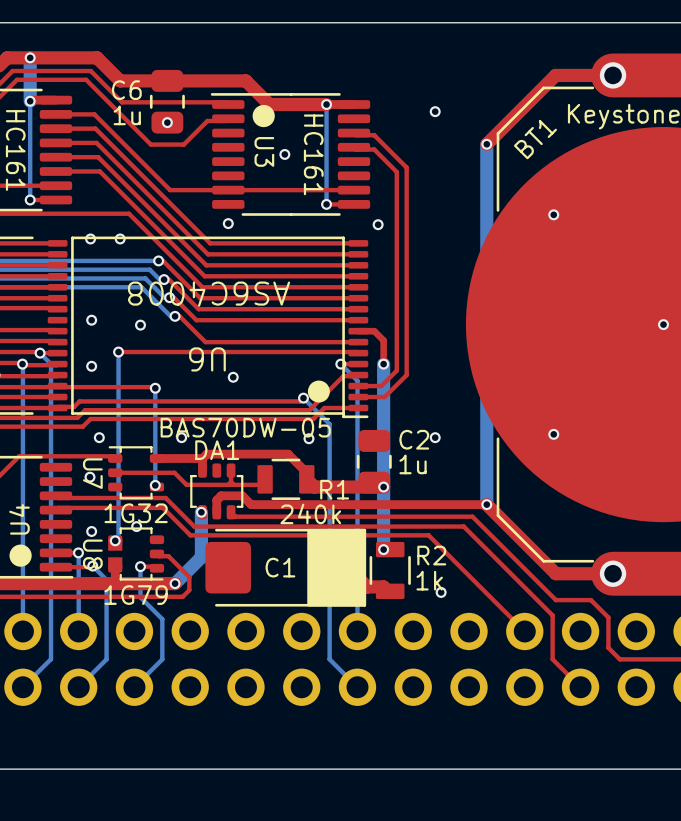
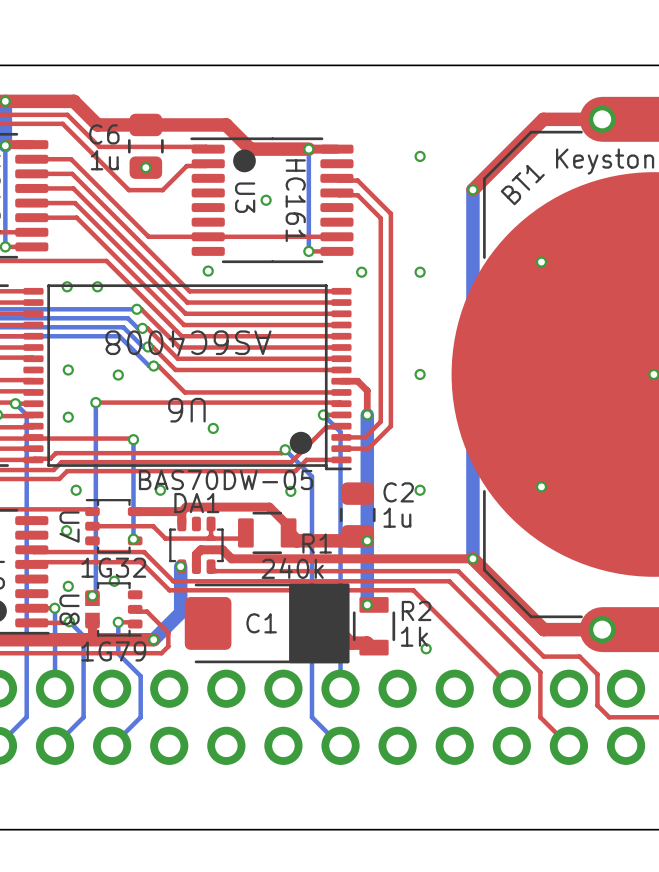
via: none -> (420, 272)
via: none -> (420, 374)

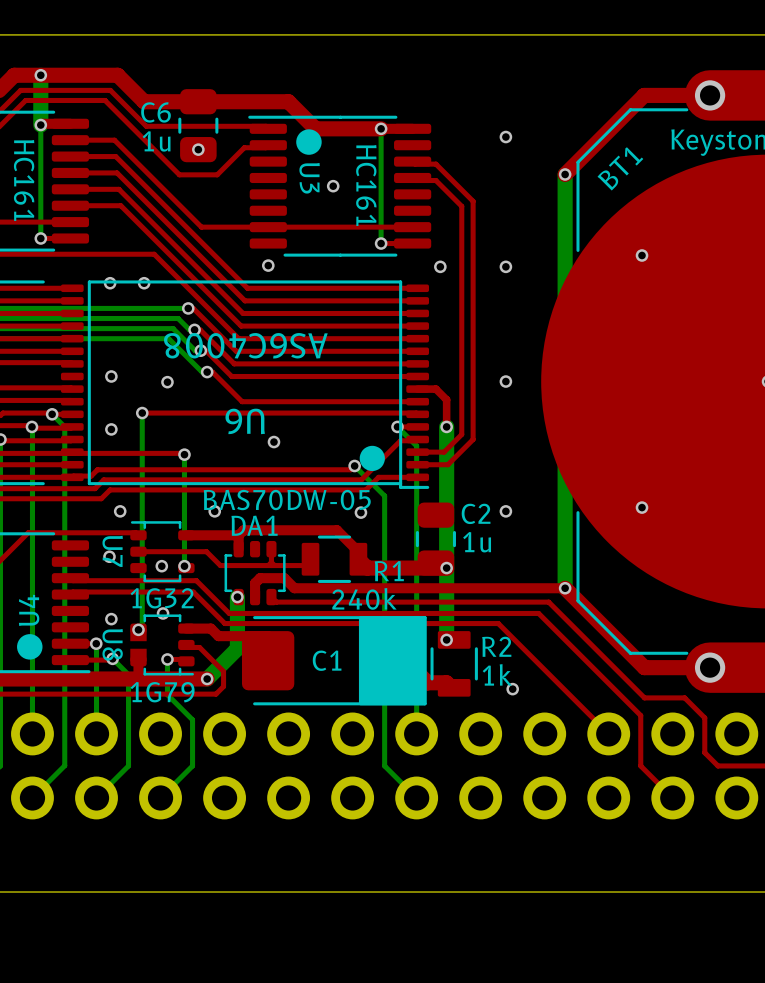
via: none -> (161, 566)
top track: none -> (186, 628) (210, 628) (218, 636) (268, 636) (268, 660)

